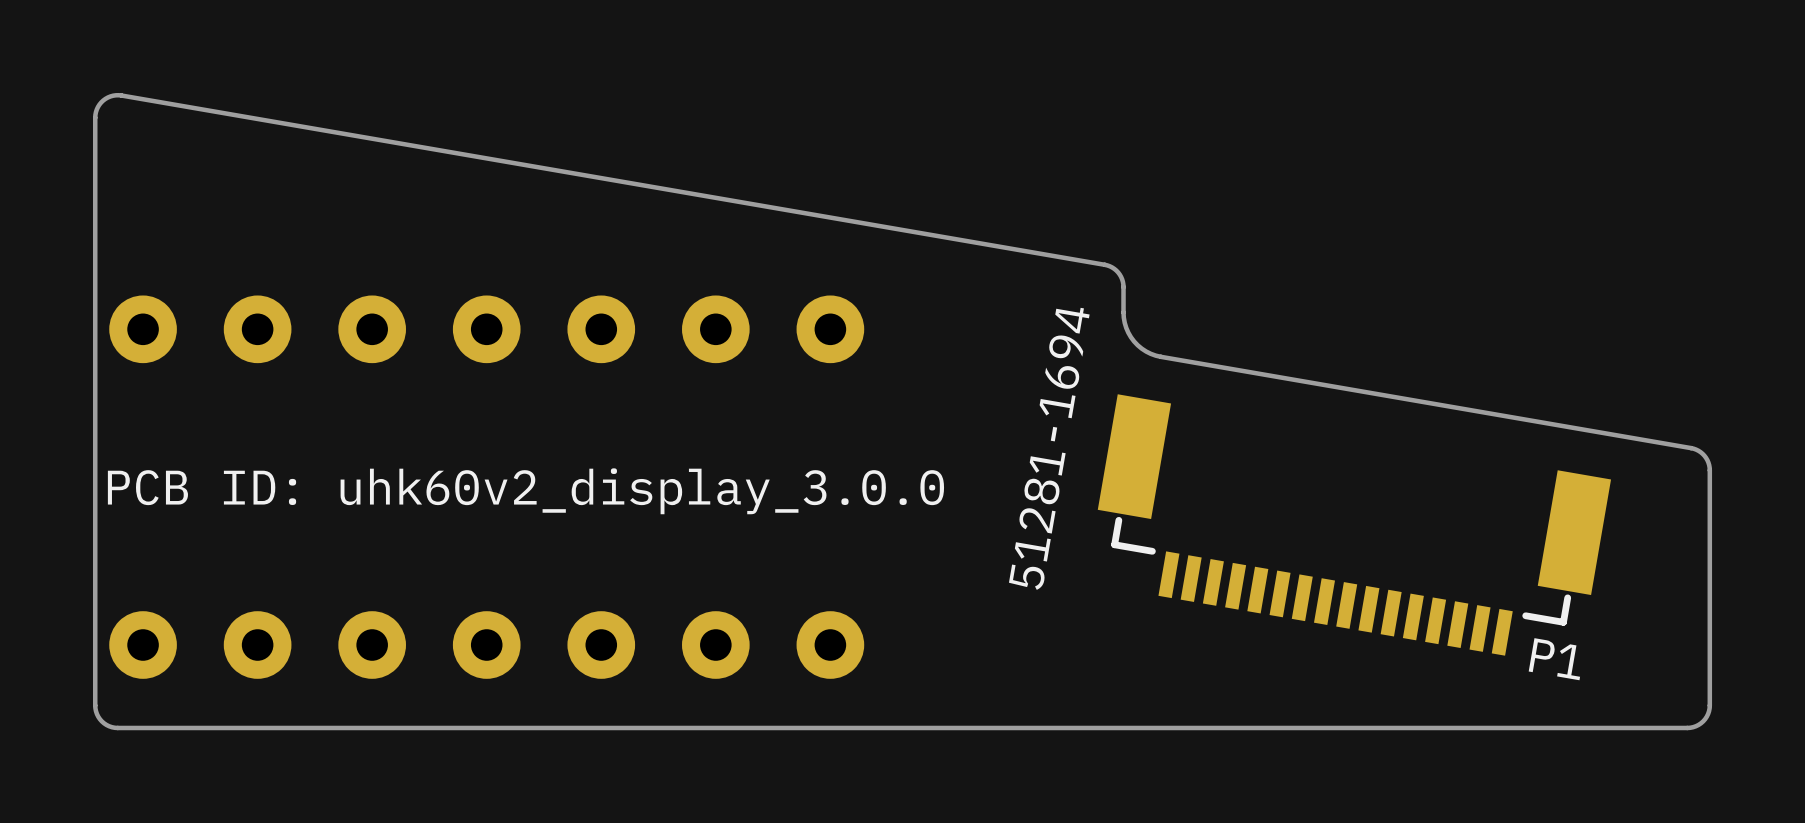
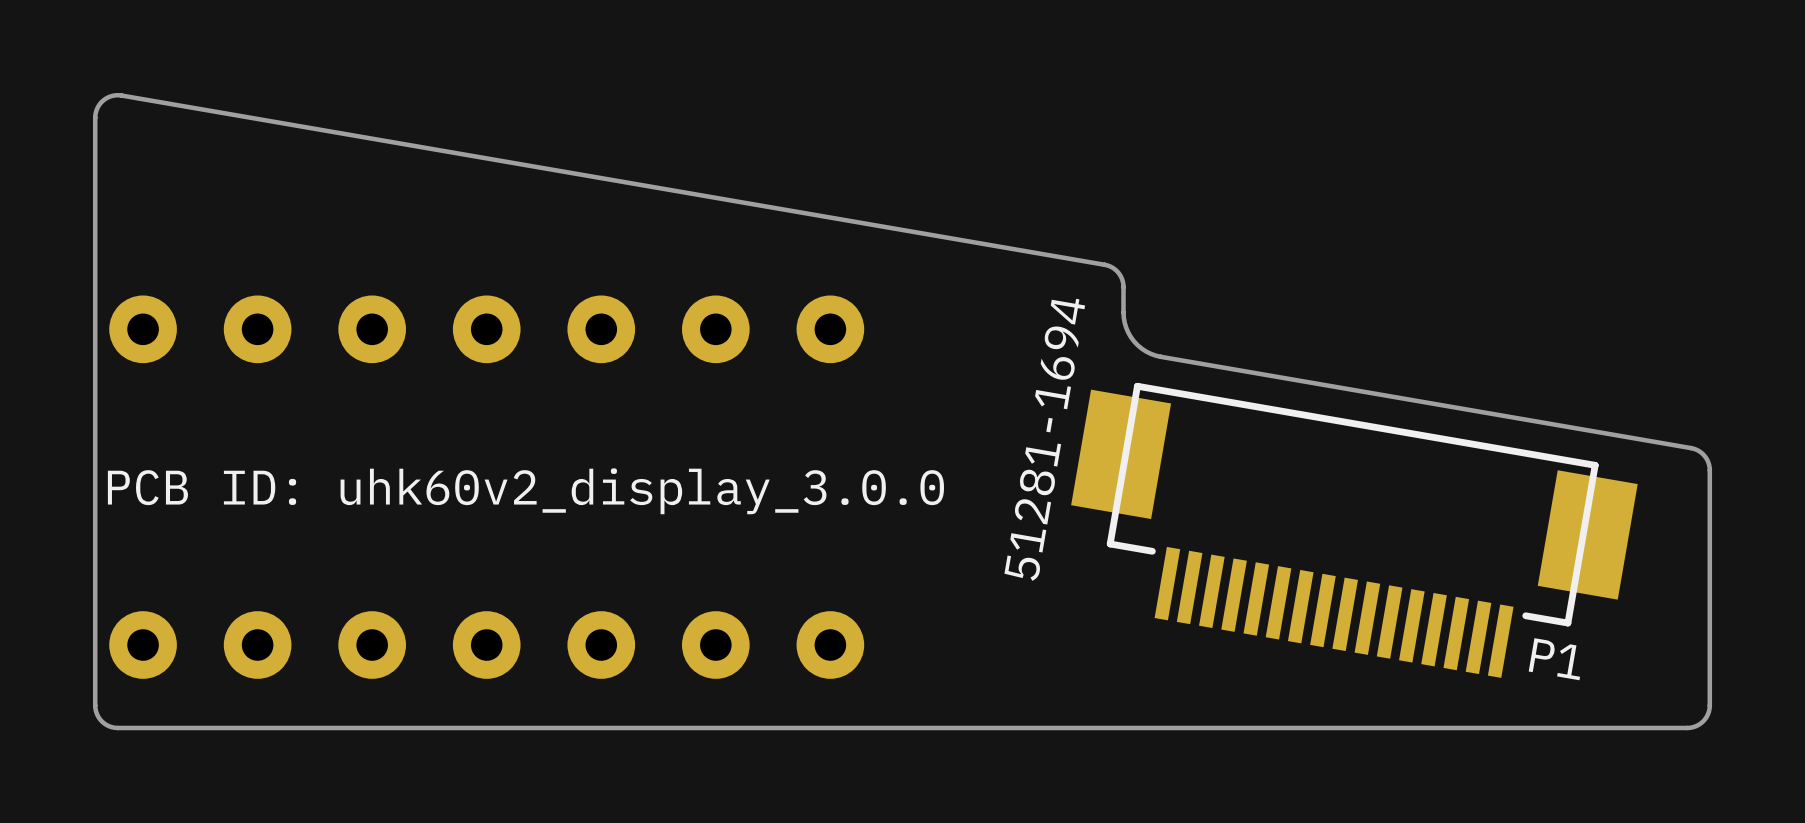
P1 footprint: [1097, 394, 1612, 656] -> [1071, 382, 1638, 678]

